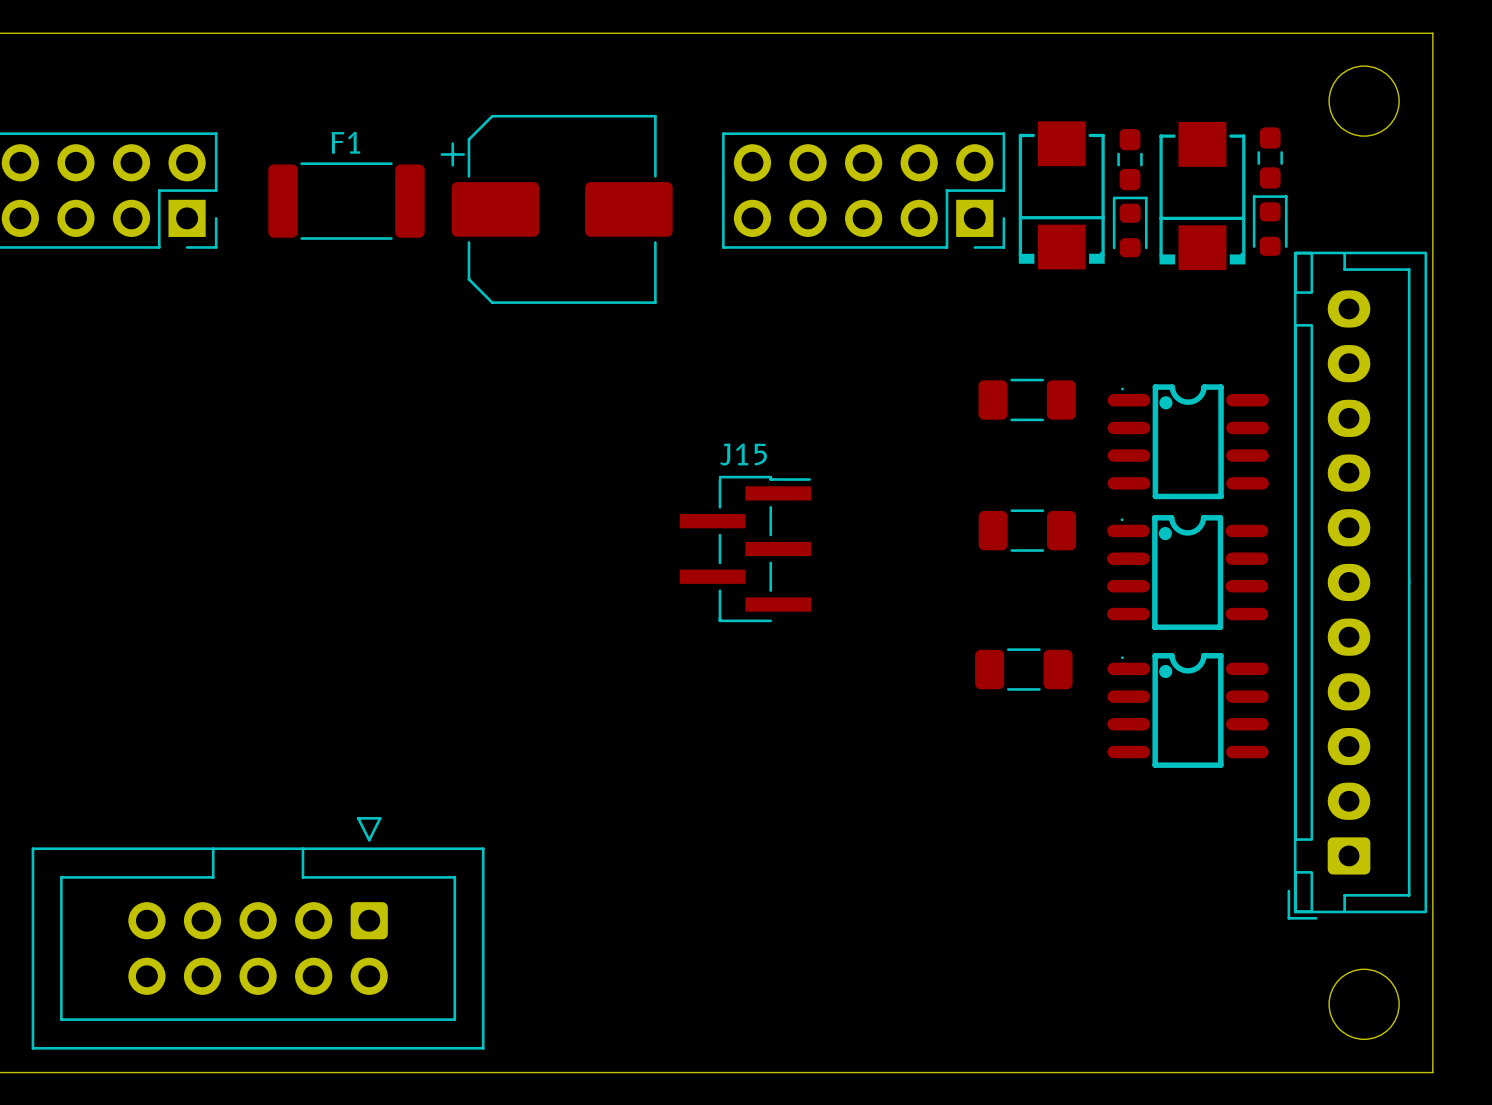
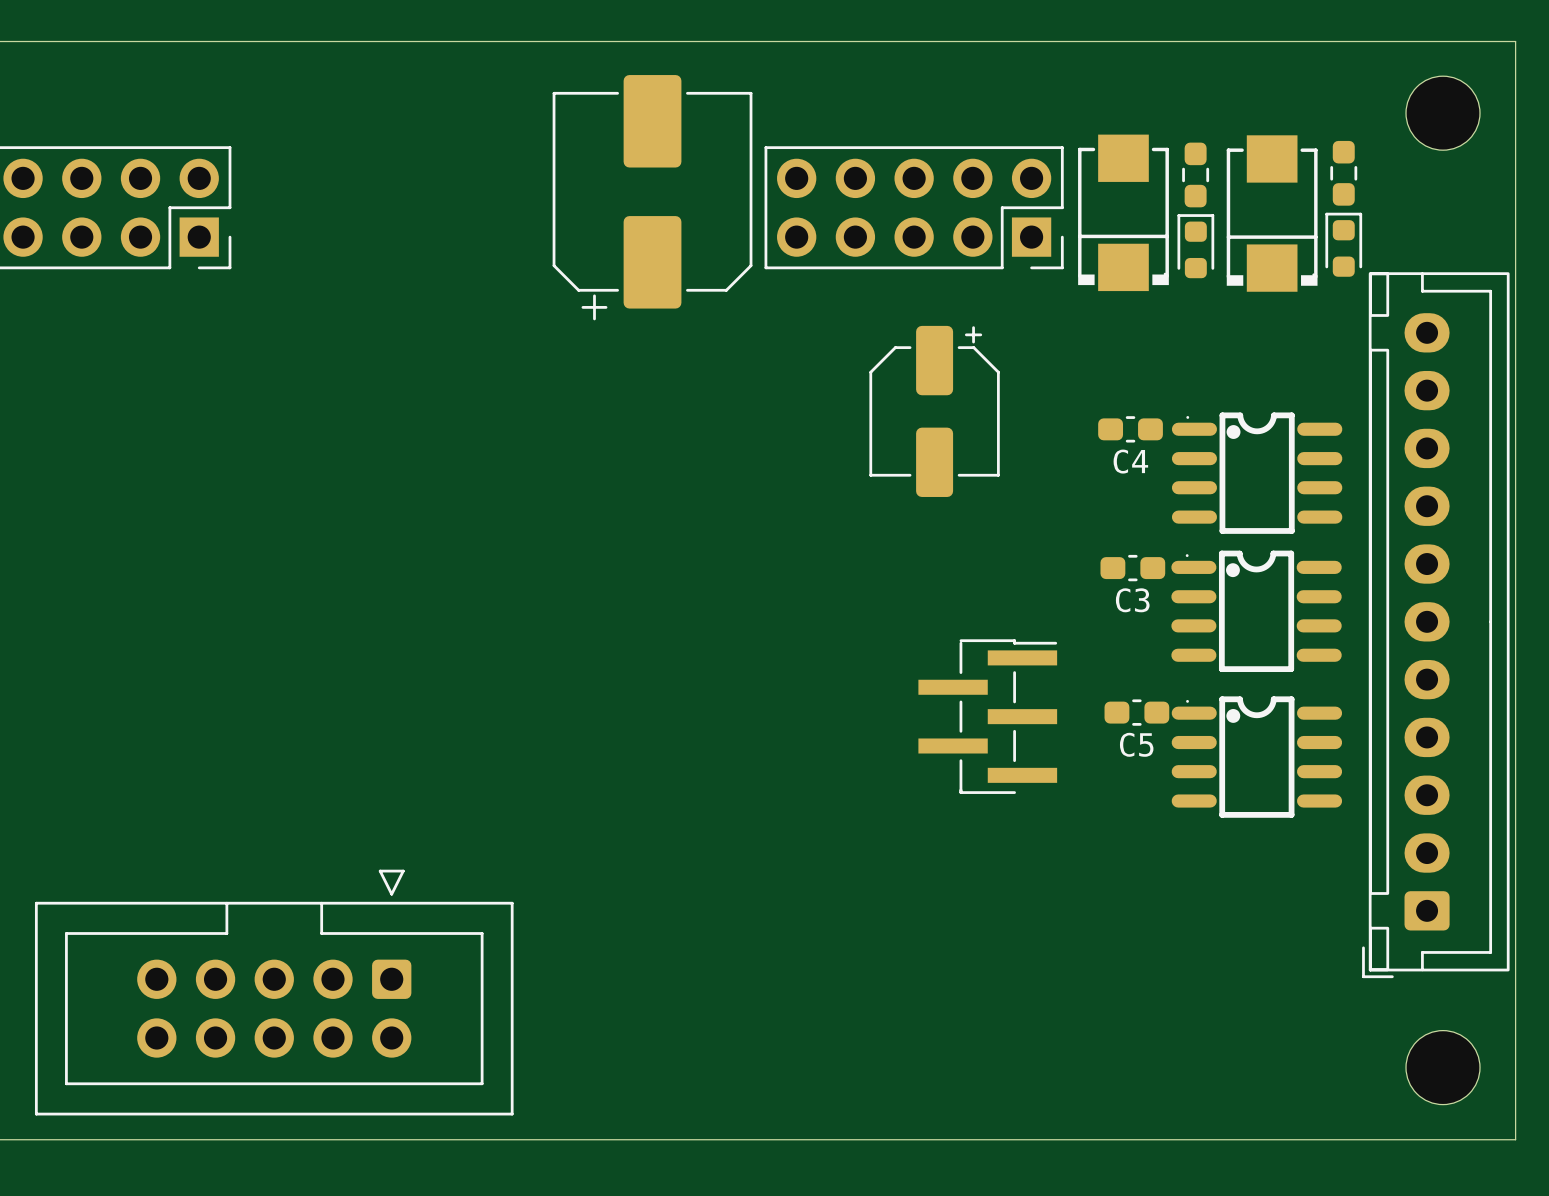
F1: (346, 201) -> none
part rotation: 0° (556, 209) -> 90° counterclockwise (652, 197)
part: none -> (934, 411)
part: (1027, 399) -> none
C4: none -> (1130, 429)
part: (1027, 530) -> none
C3: none -> (1132, 568)
J15: (745, 548) -> none
C5: none -> (1136, 712)
part: (1023, 669) -> none
part: none -> (987, 716)

